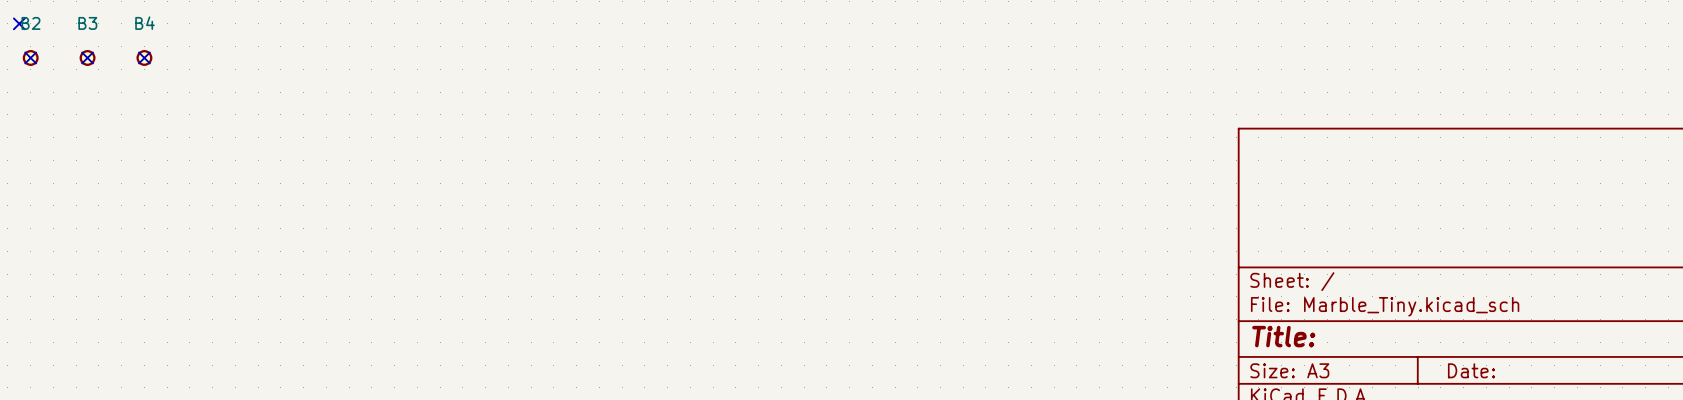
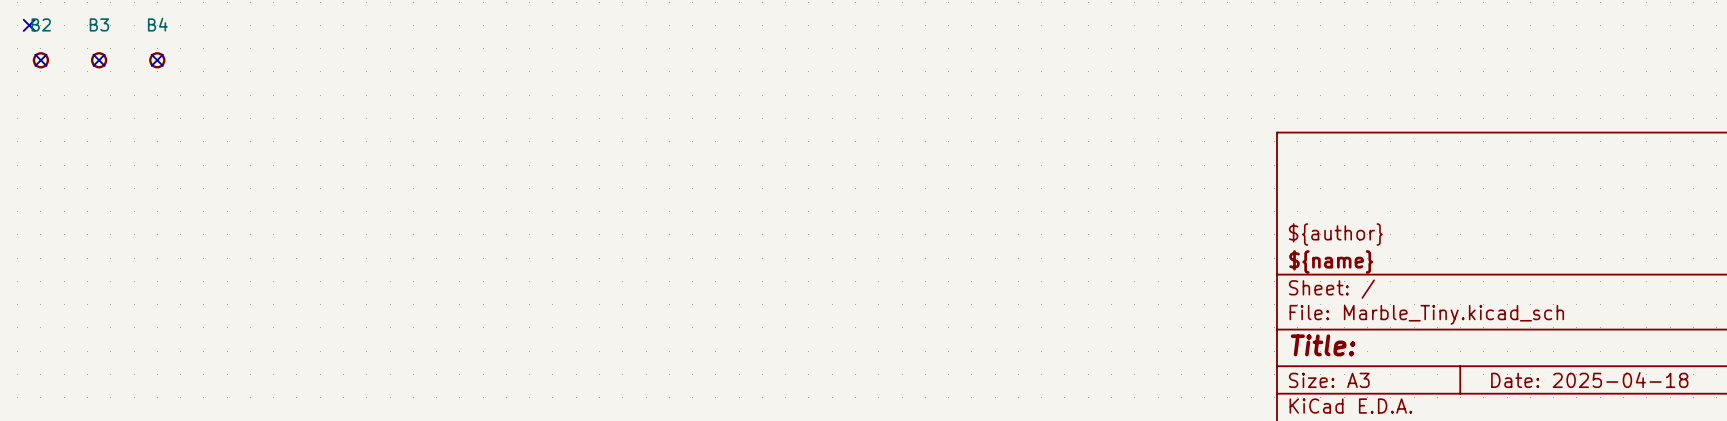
title block: none -> ${author} (1335, 234)
title block: none -> ${name} (1331, 261)
title block: Date: (1471, 370) -> Date: 2025-04-18 (1589, 380)

